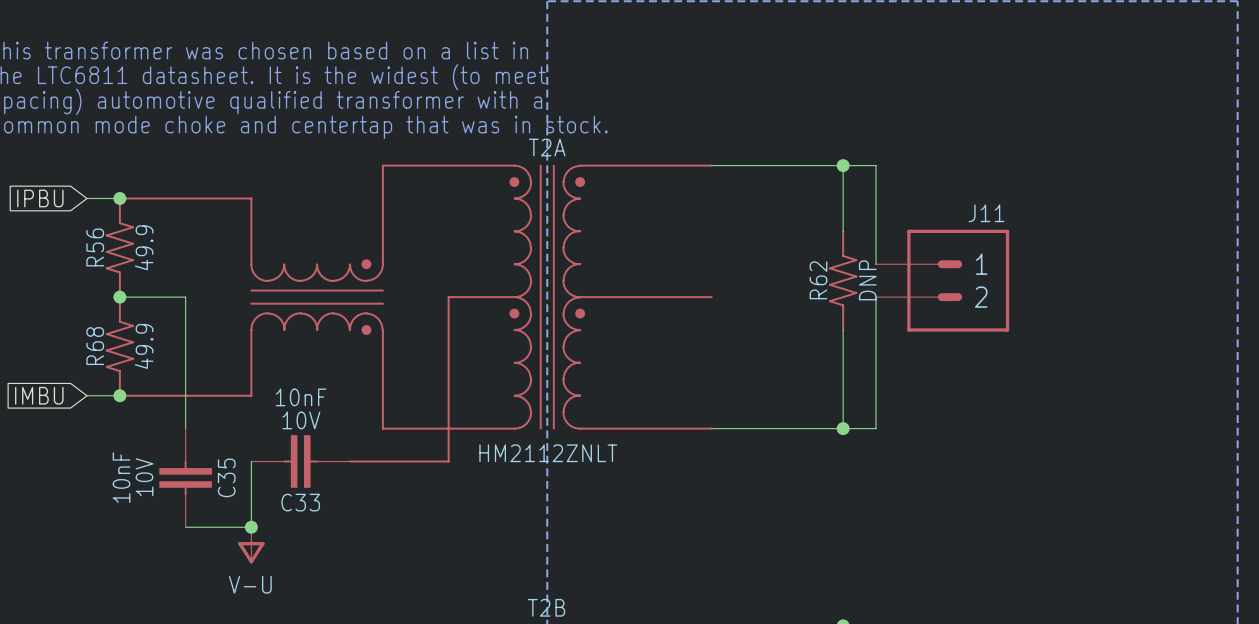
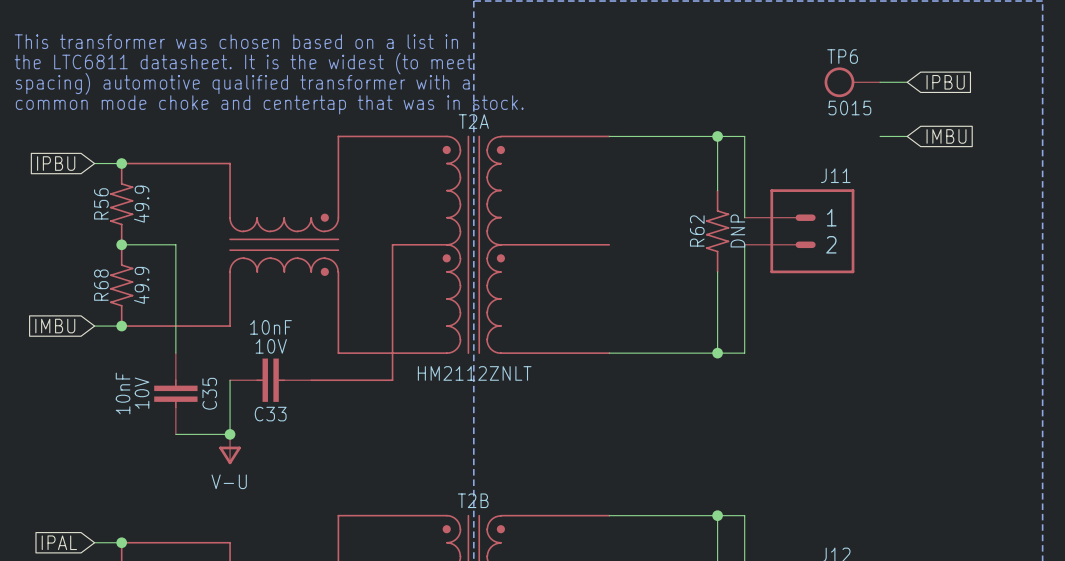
TP6: none -> (852, 82)
wire: none -> (880, 82) (907, 82)
global label: none -> IPBU (945, 82)
wire: none -> (880, 136) (907, 136)
global label: none -> IMBU (946, 136)

